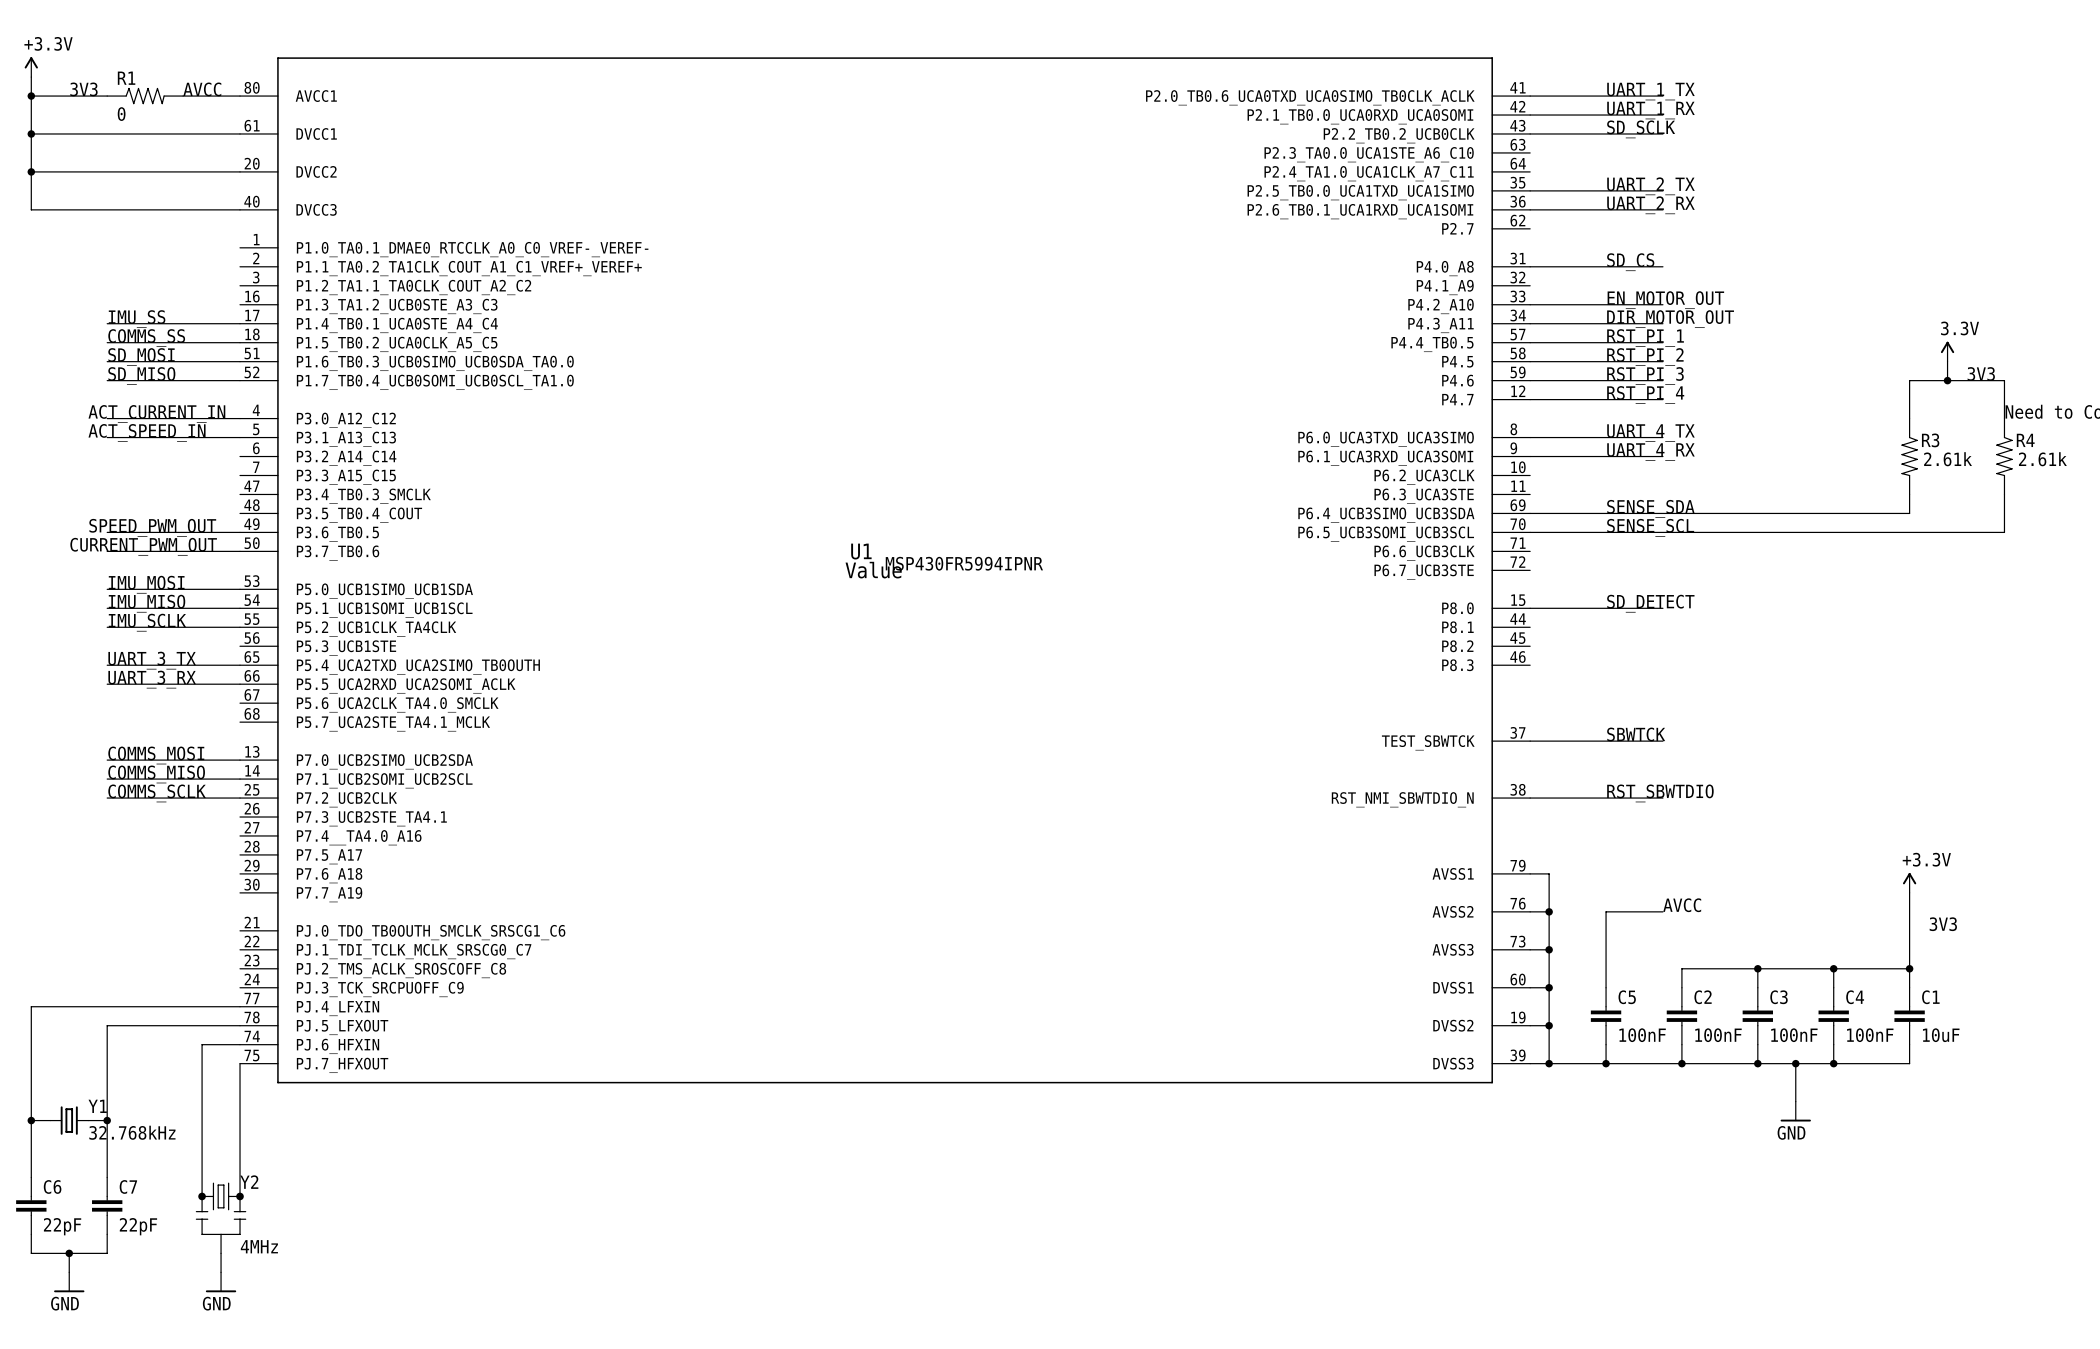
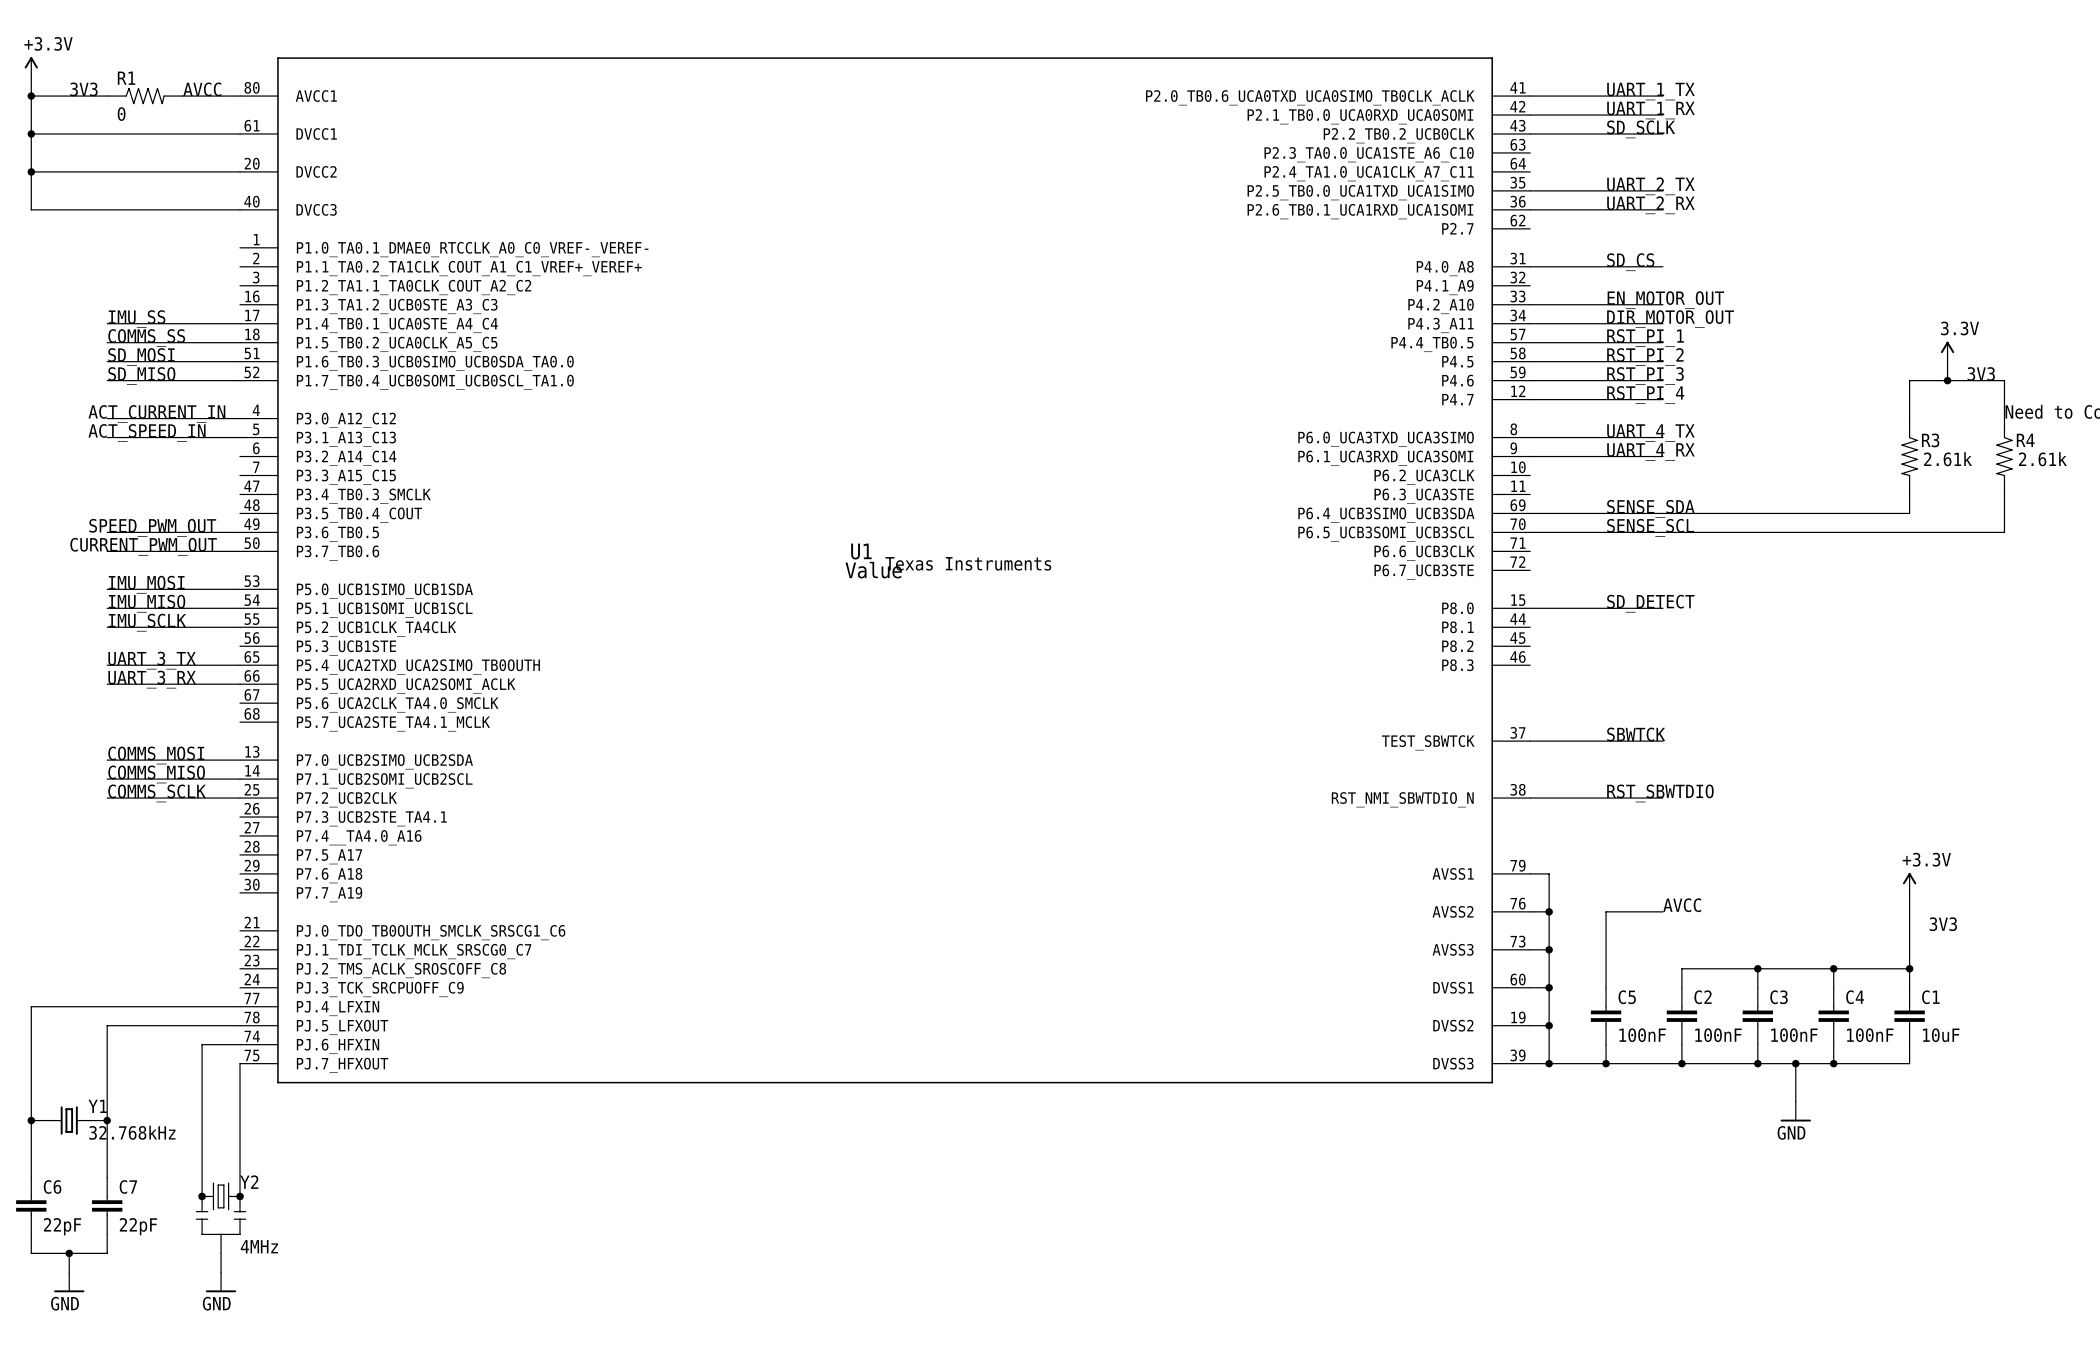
U1 text: MSP430FR5994IPNR (964, 563) -> none
U1 text: none -> Texas Instruments (968, 563)

